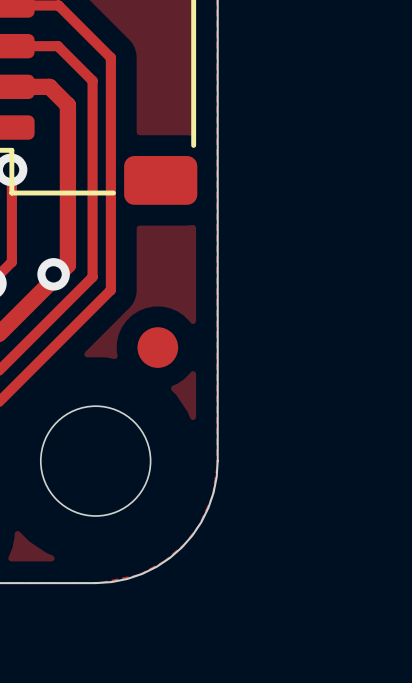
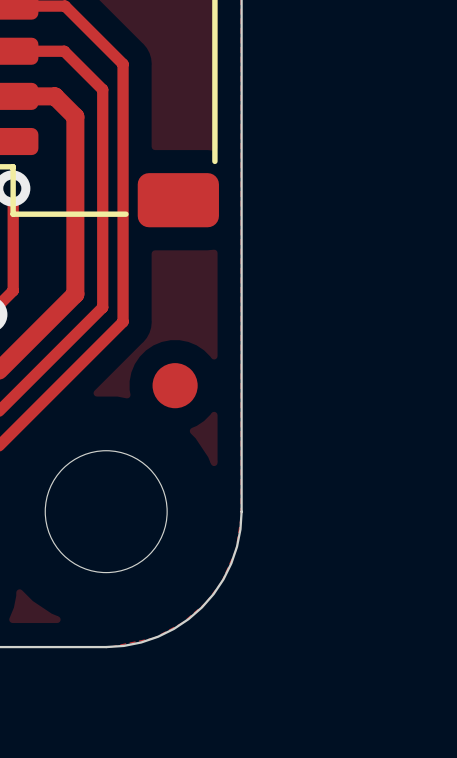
via: (53, 274) -> none

